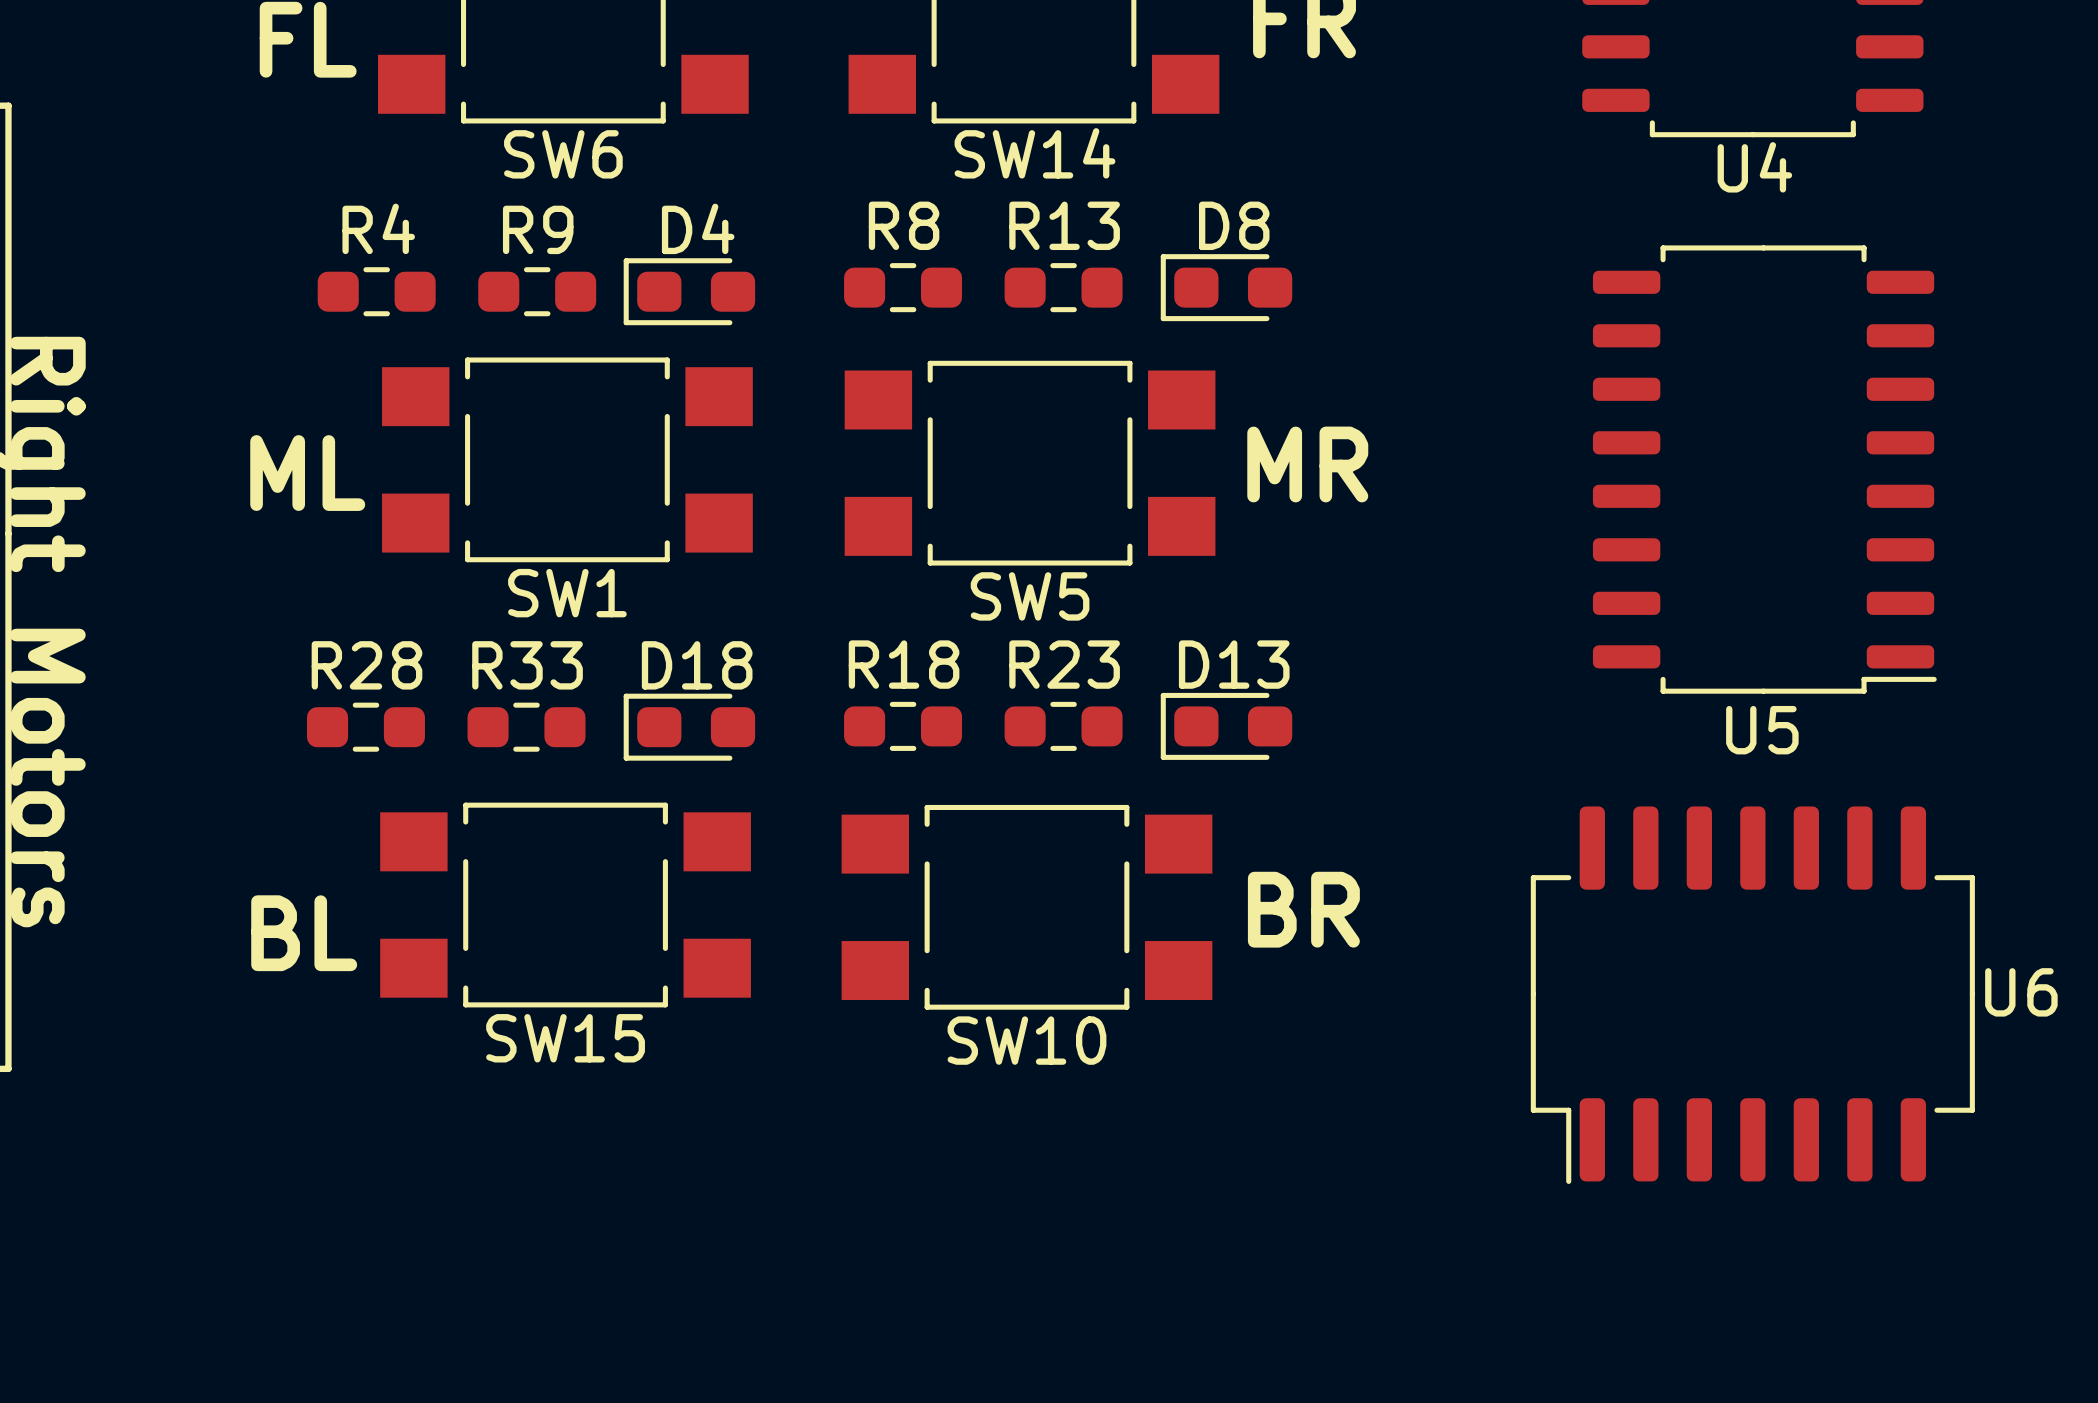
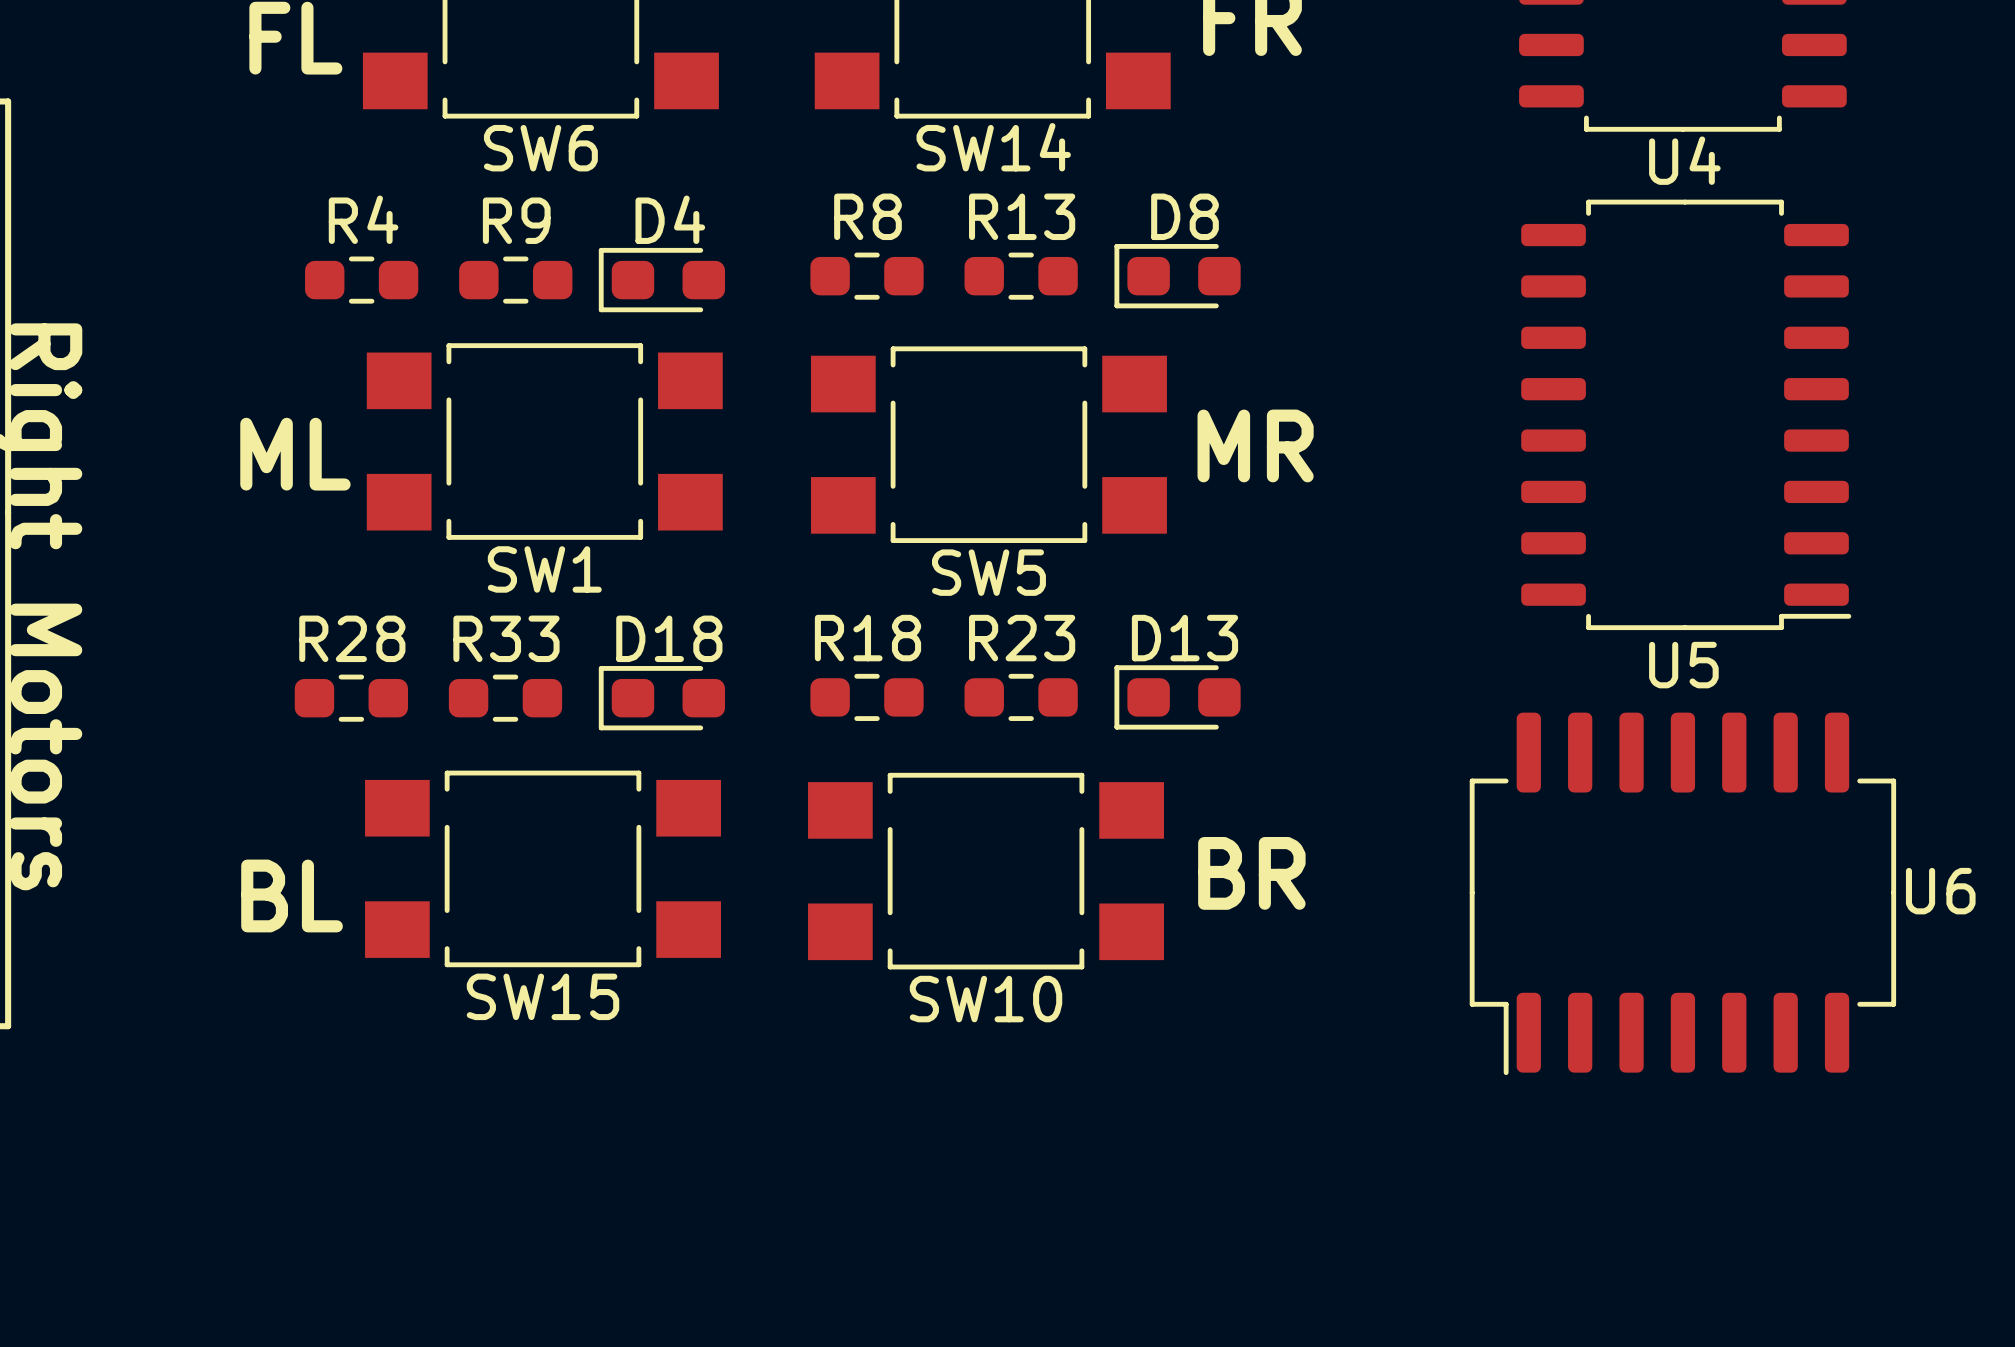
U5 position: (1764, 469) -> (1686, 414)
U6 position: (1752, 995) -> (1682, 893)

